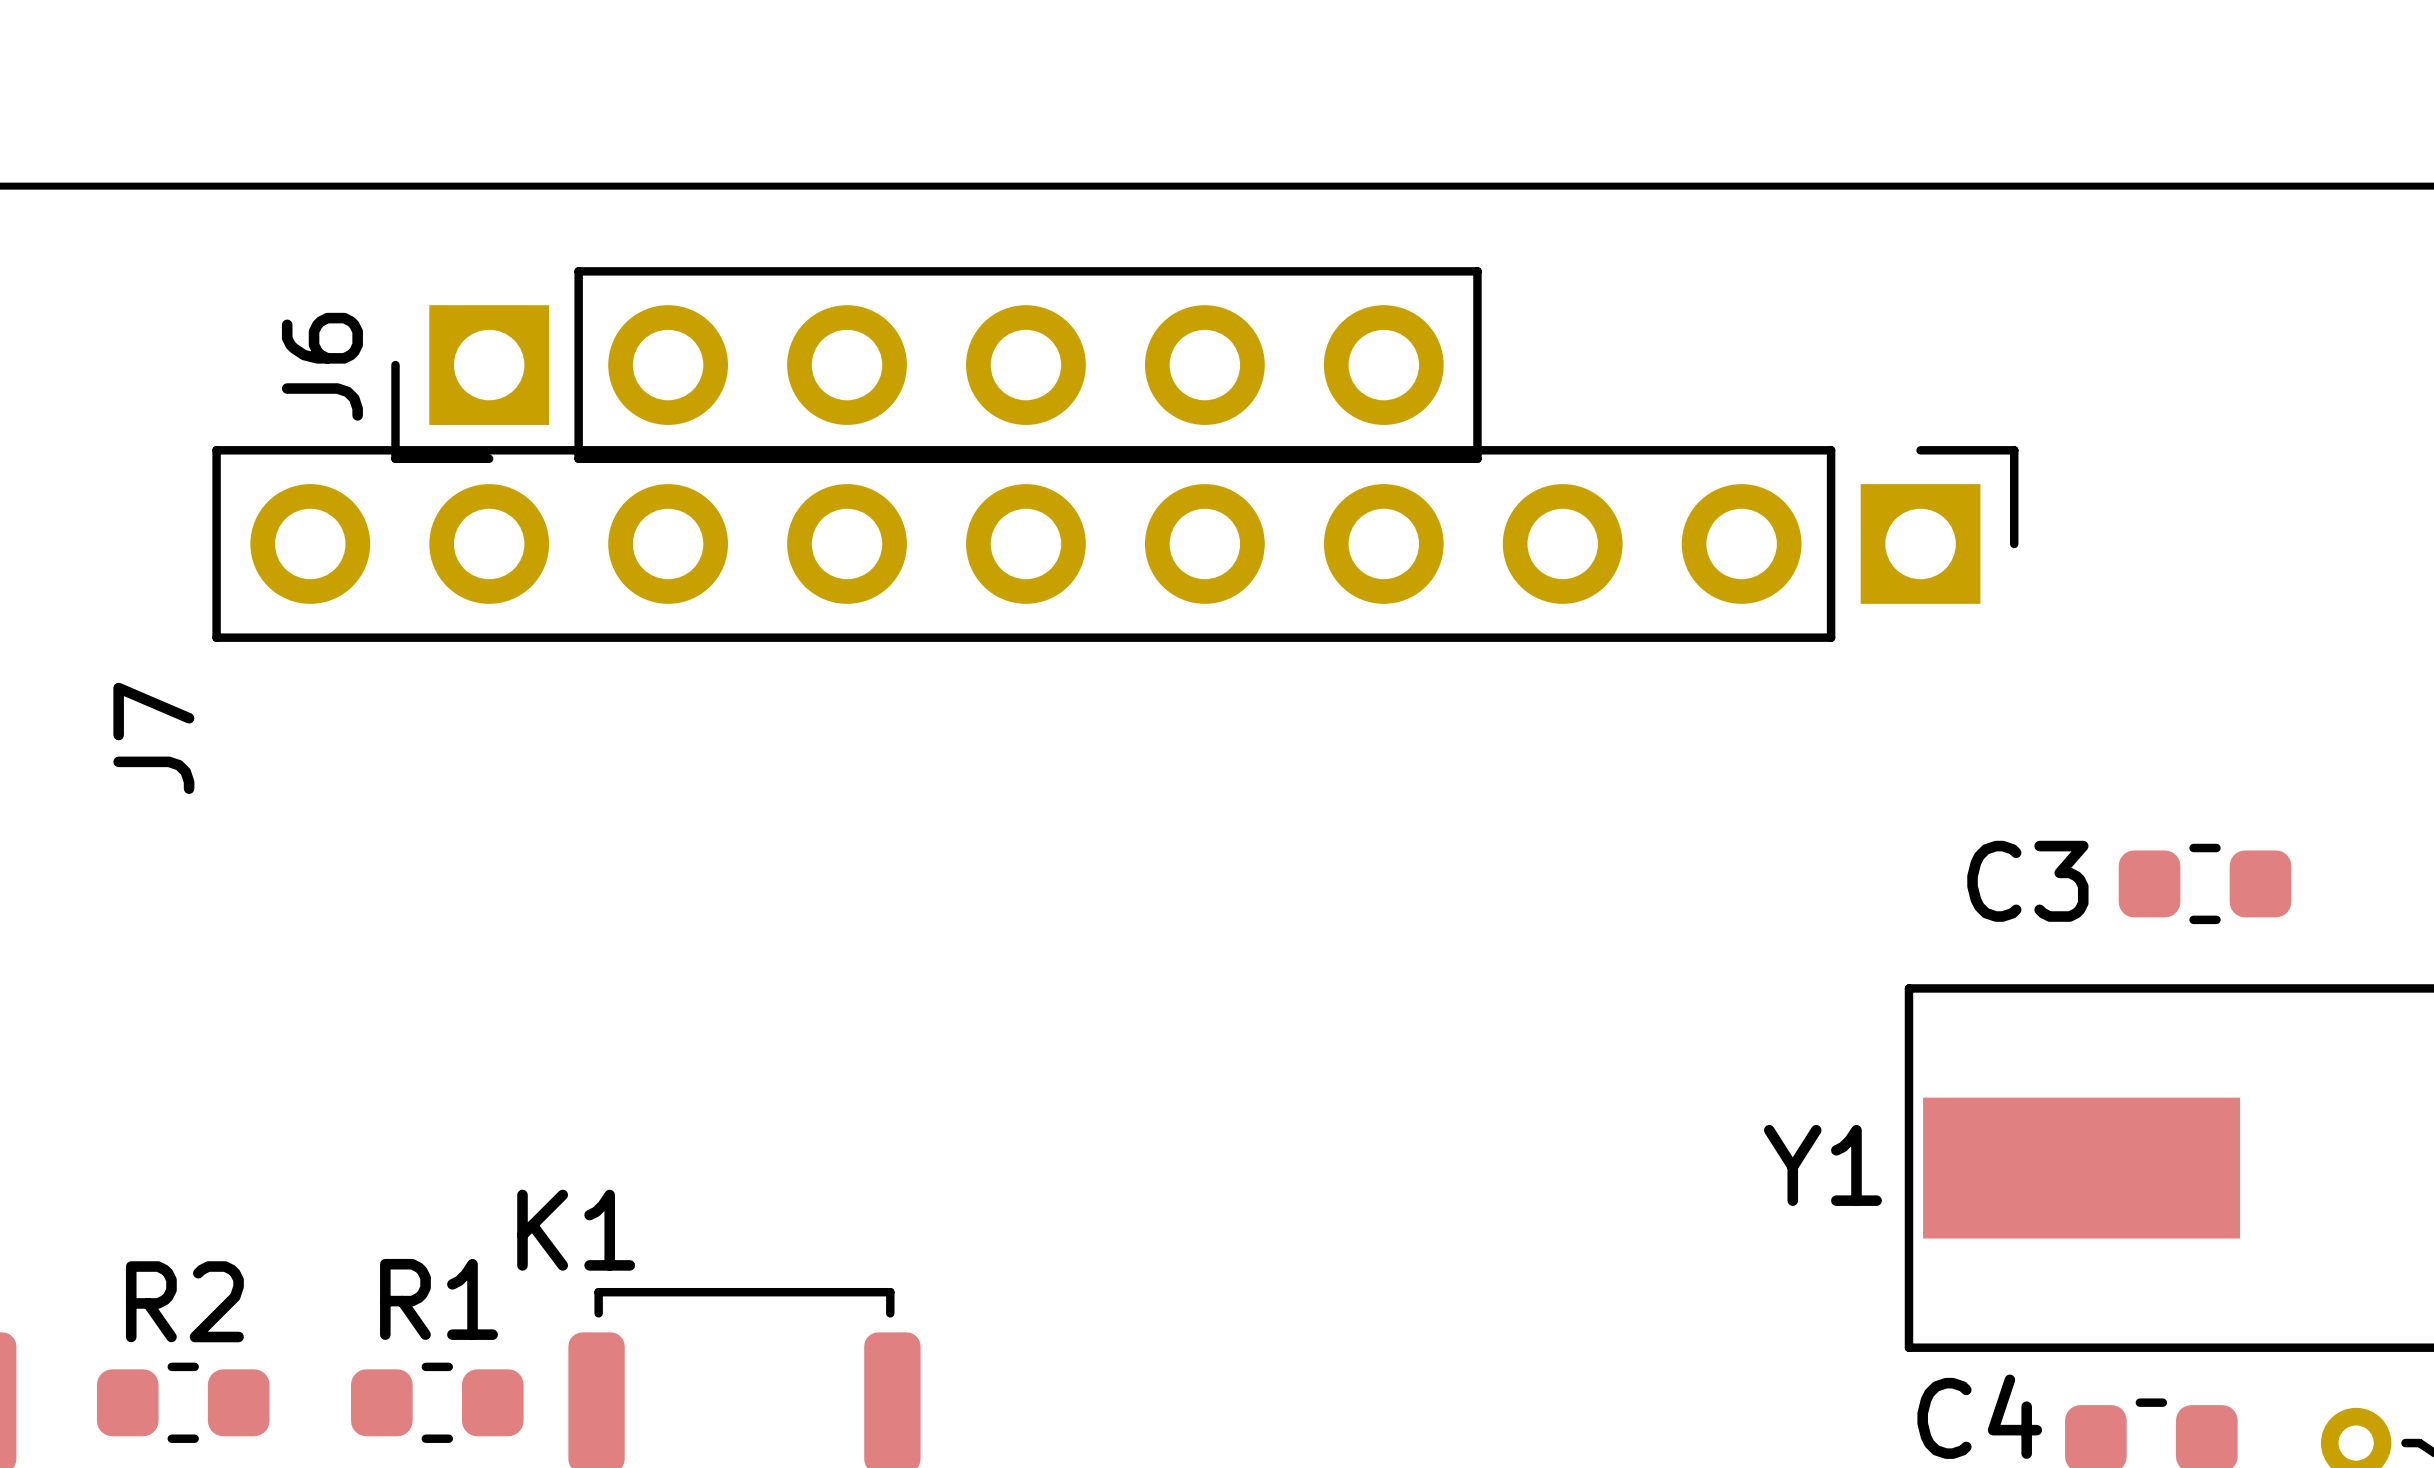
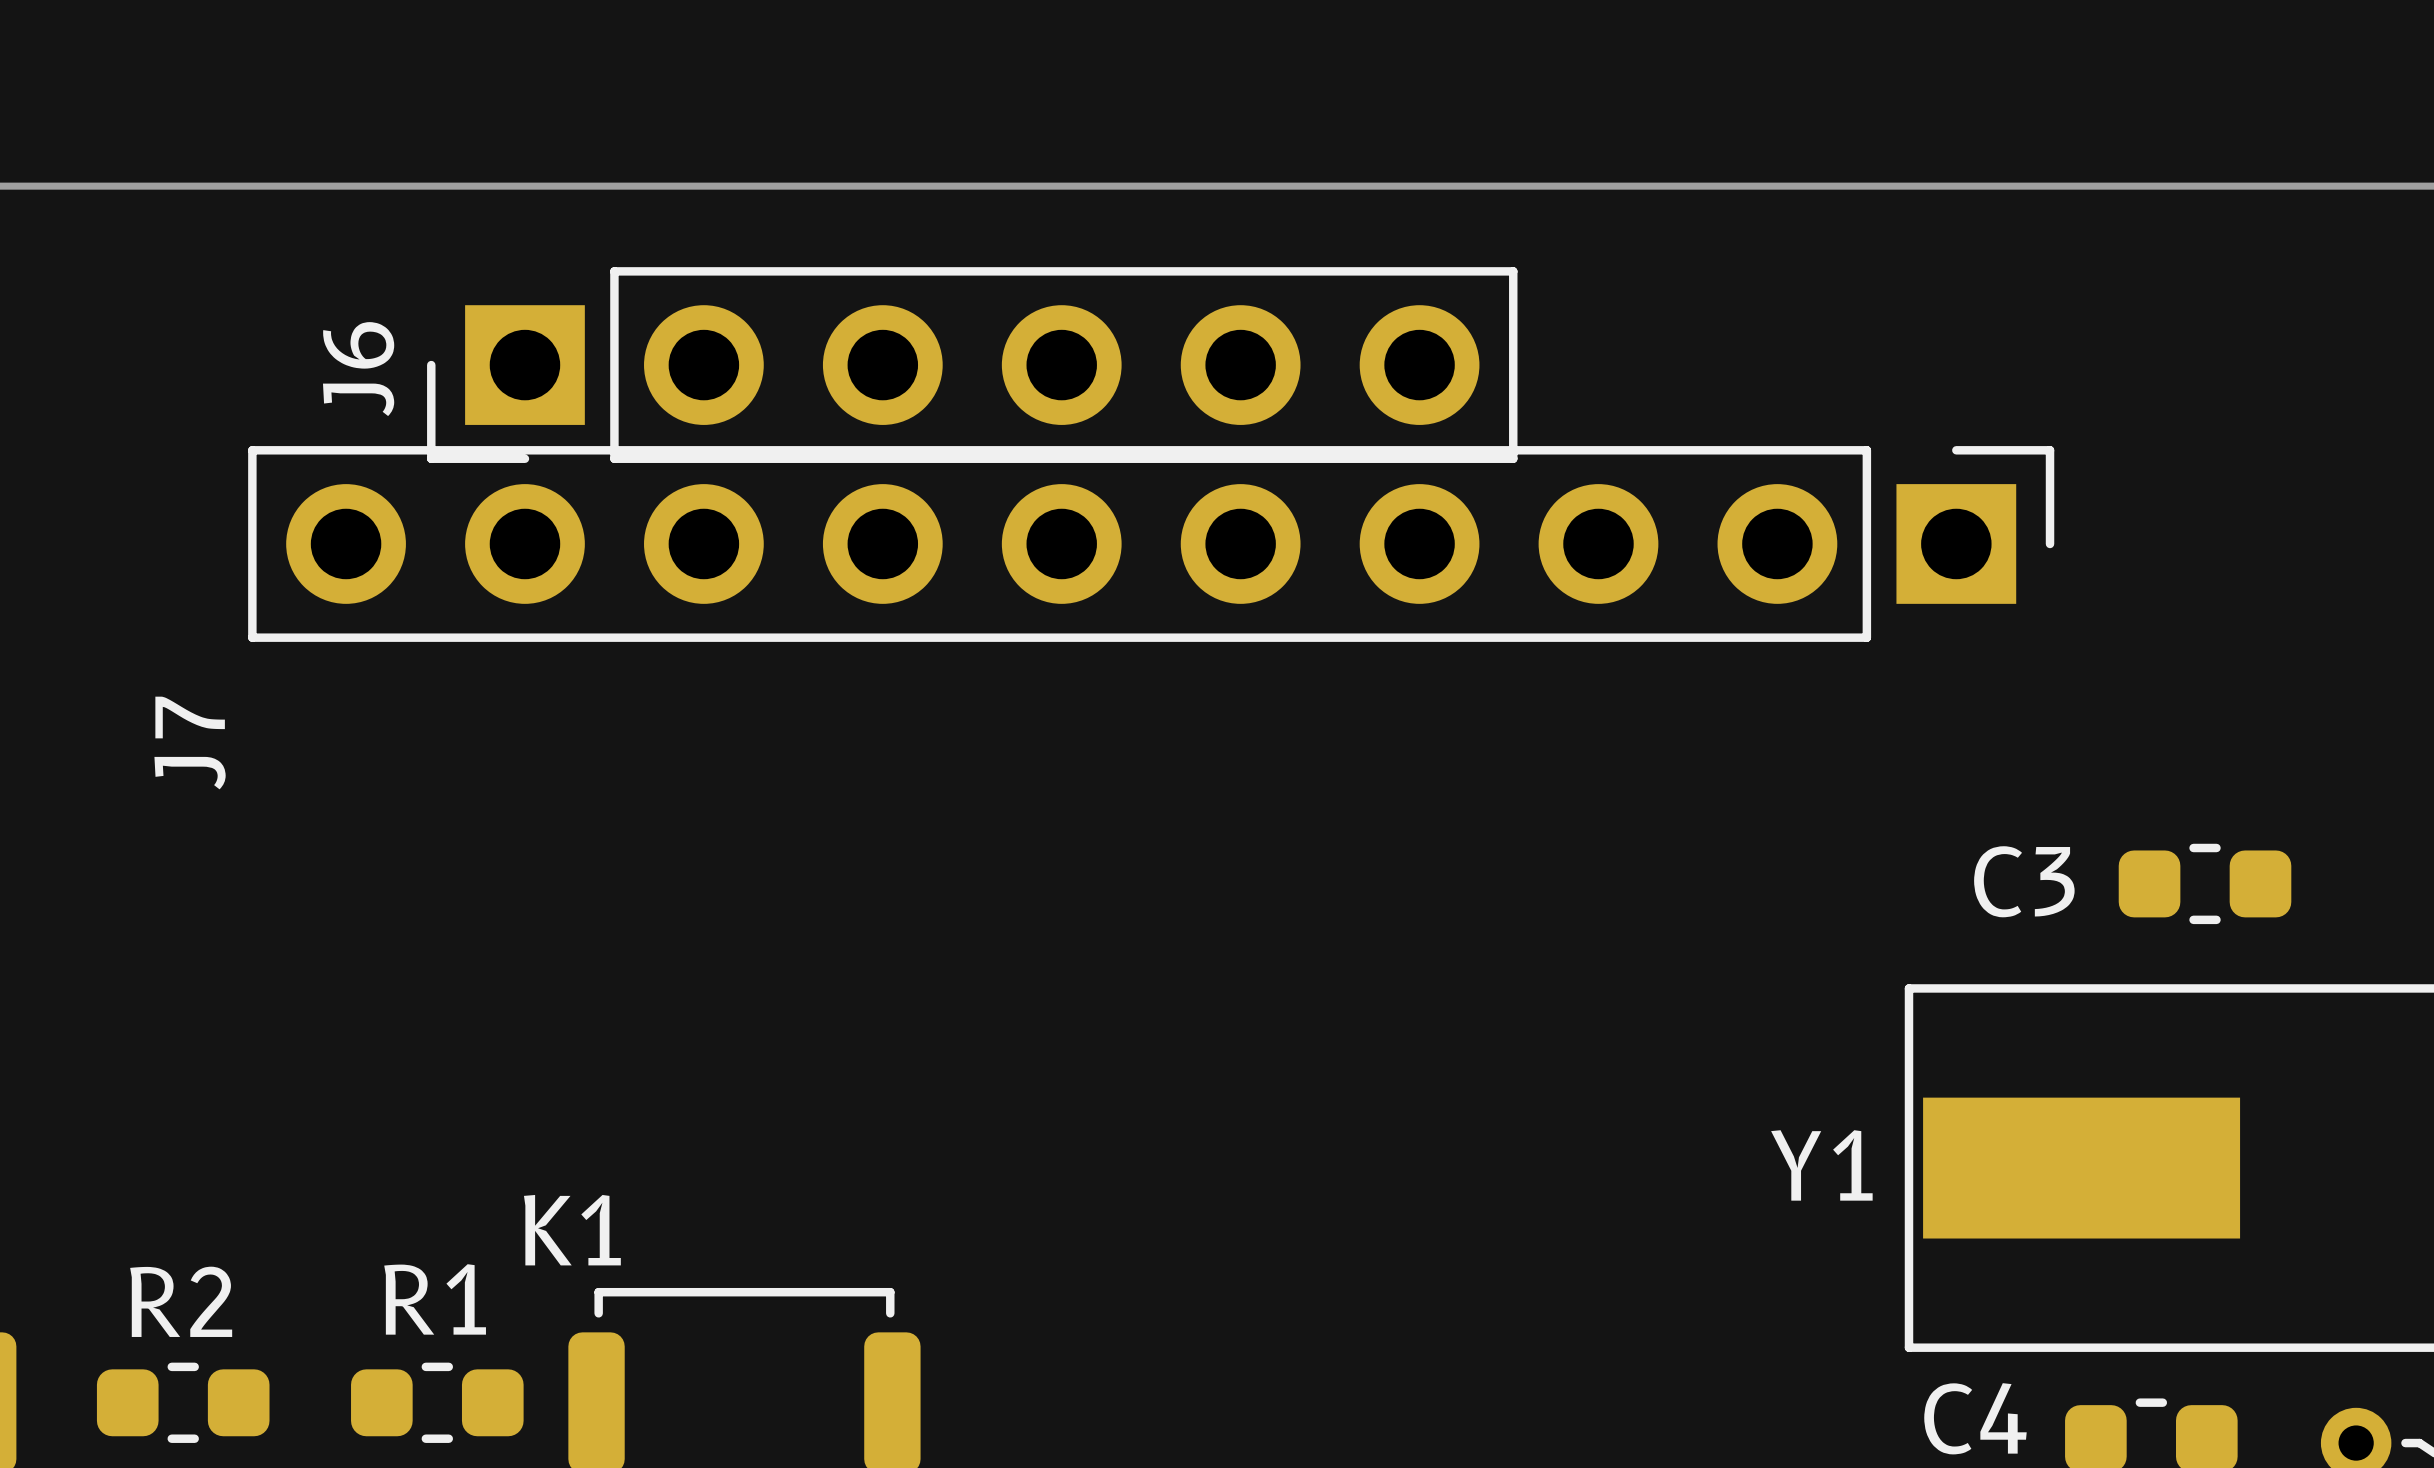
J6 position: (936, 365) -> (972, 365)
J7 position: (1115, 543) -> (1151, 543)

